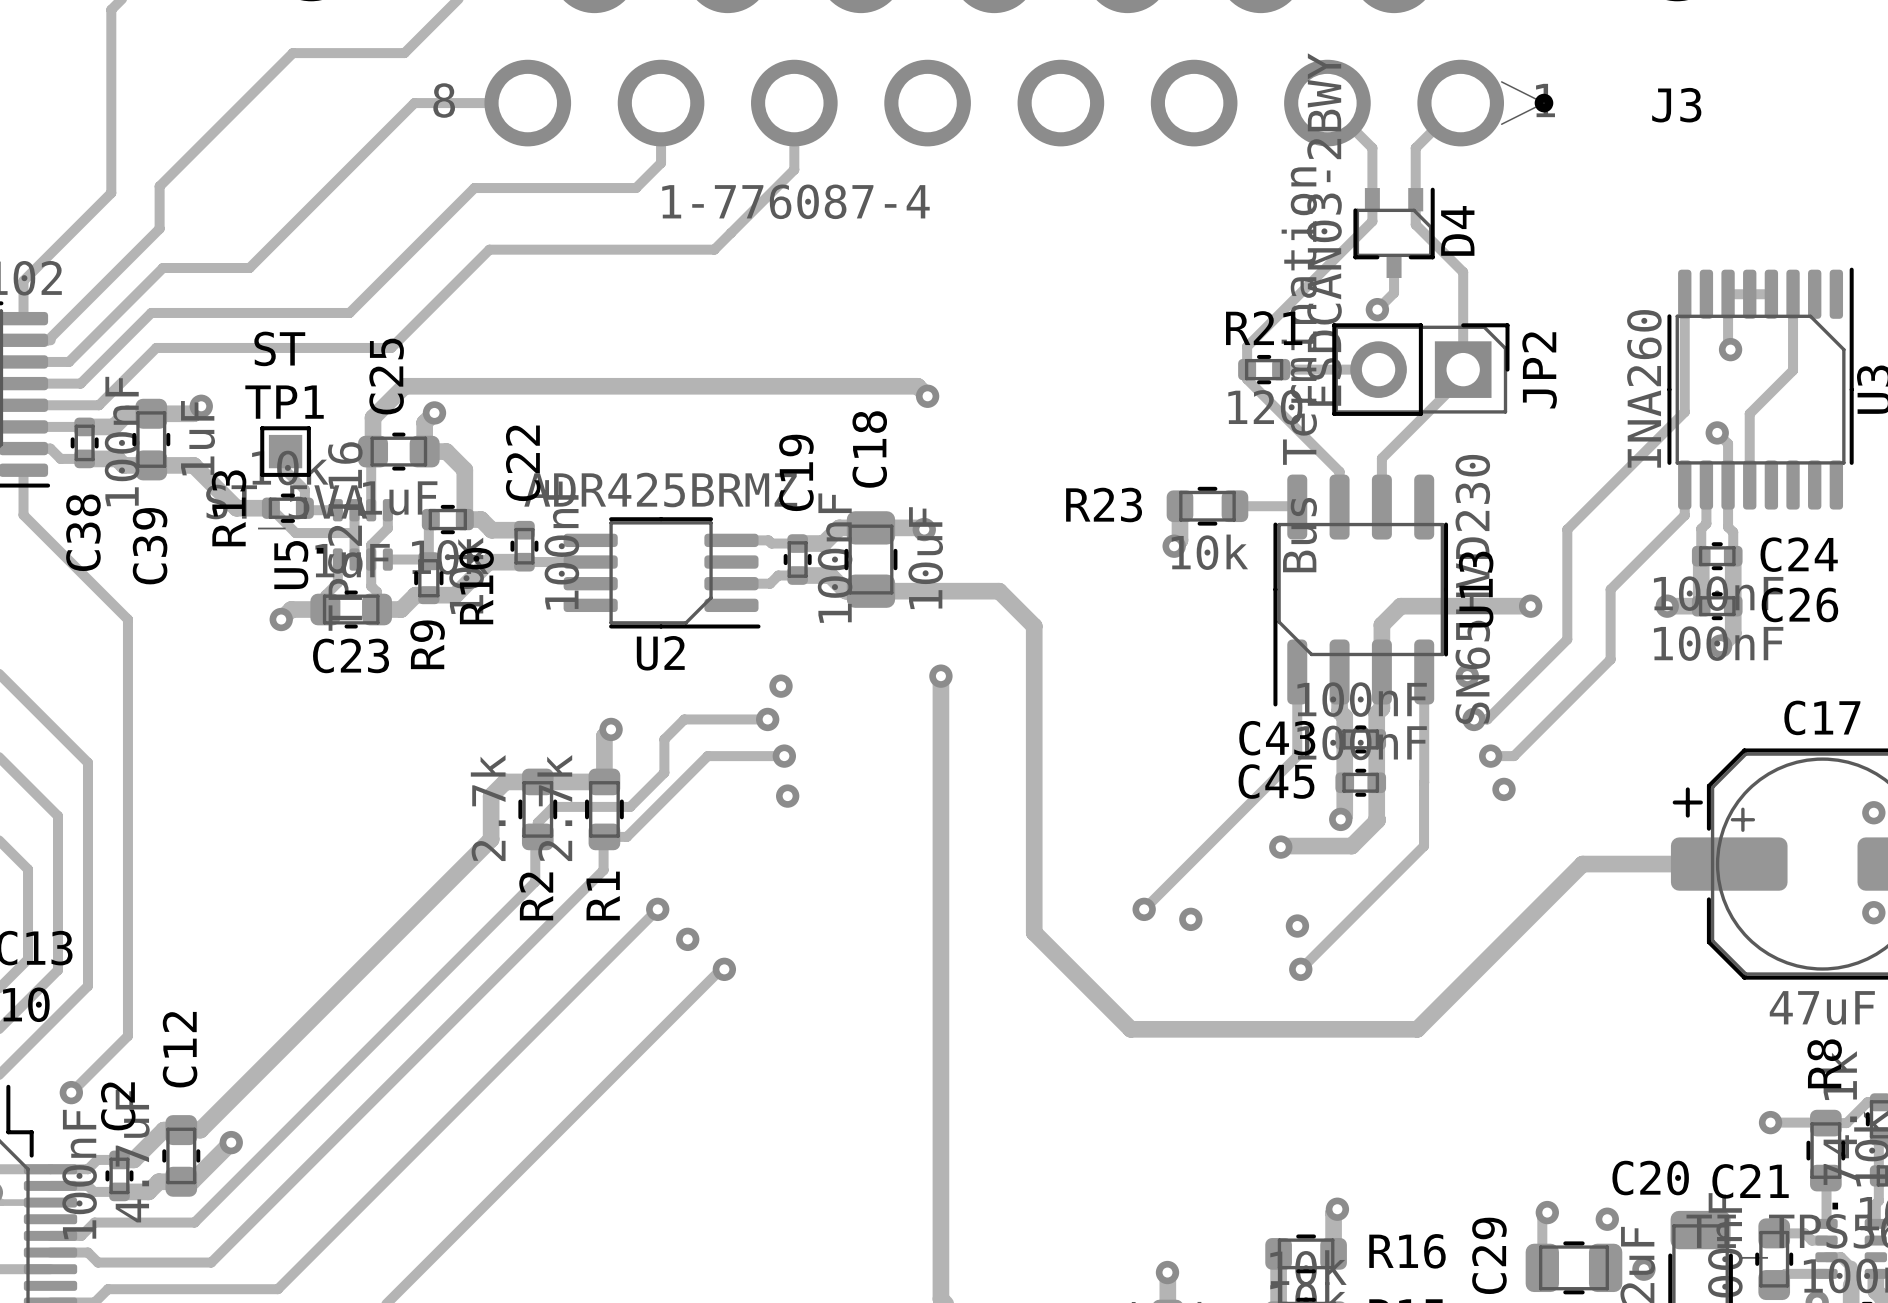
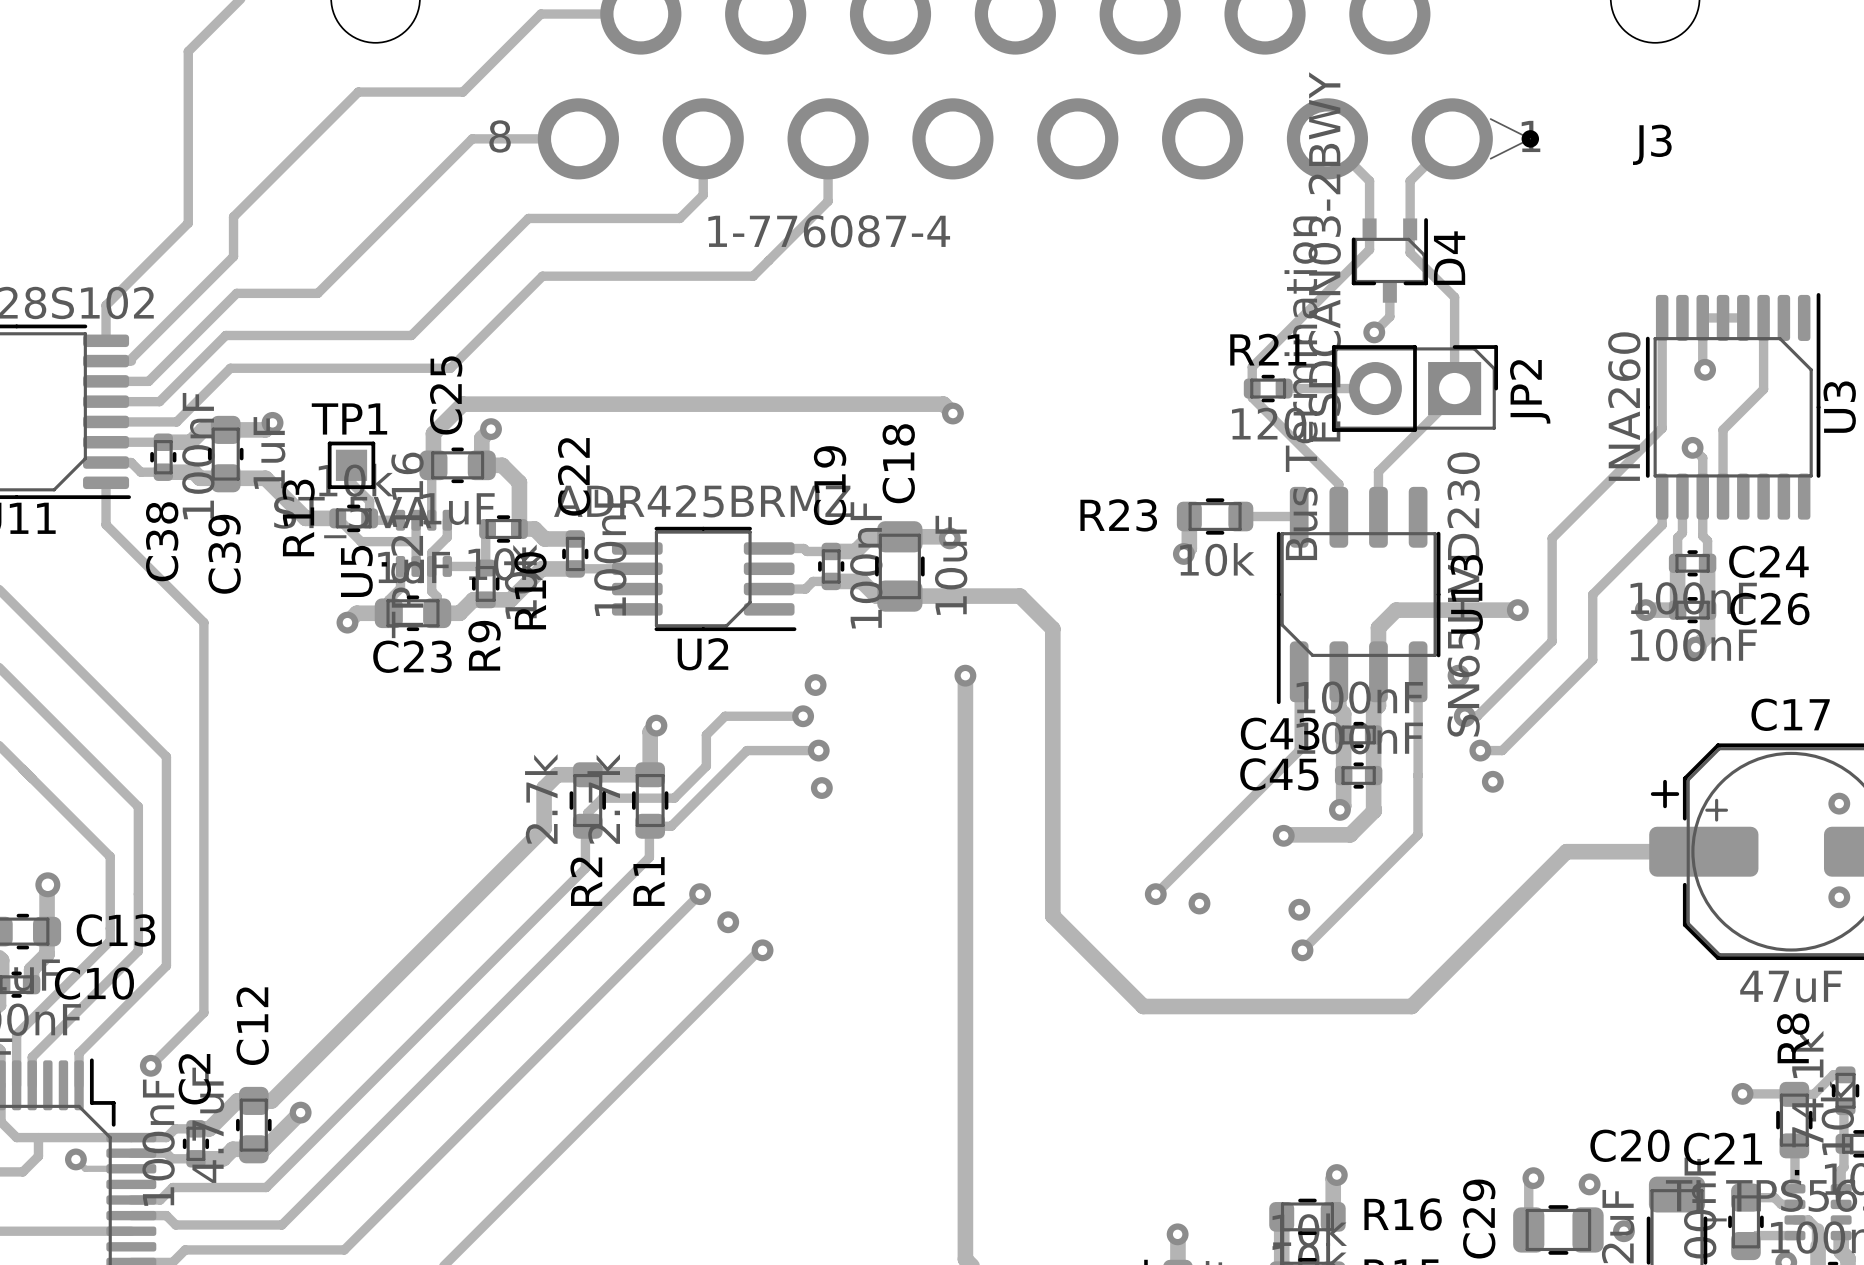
text: ST (279, 348) -> none

